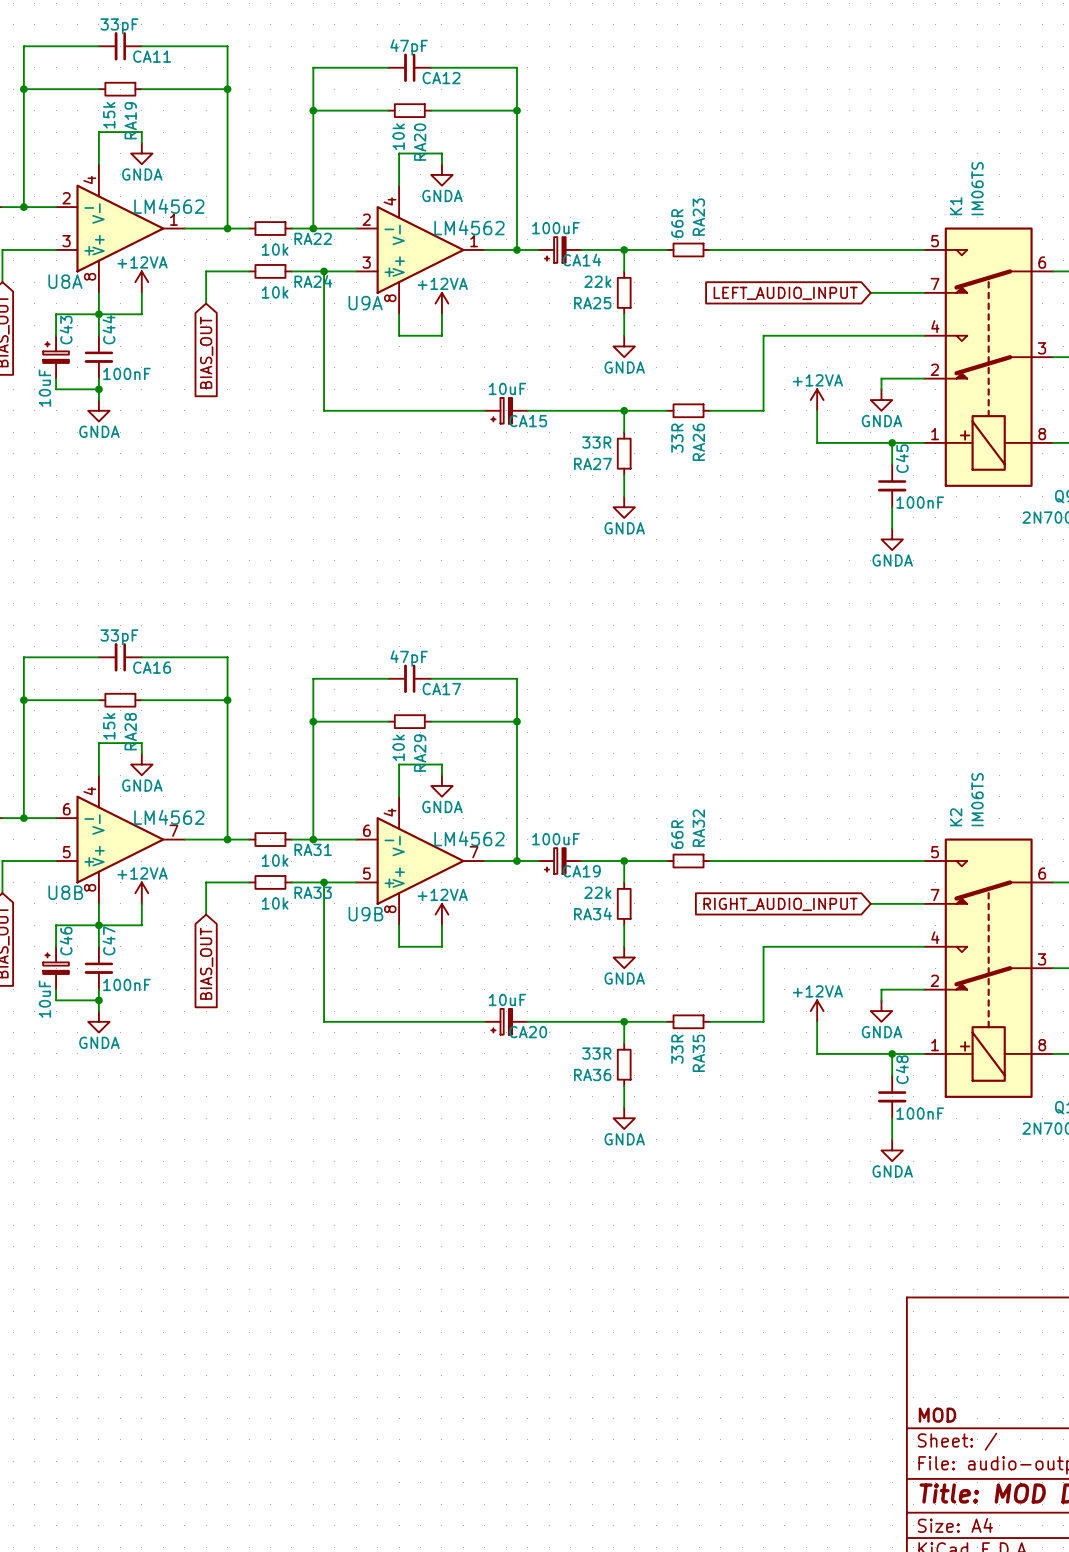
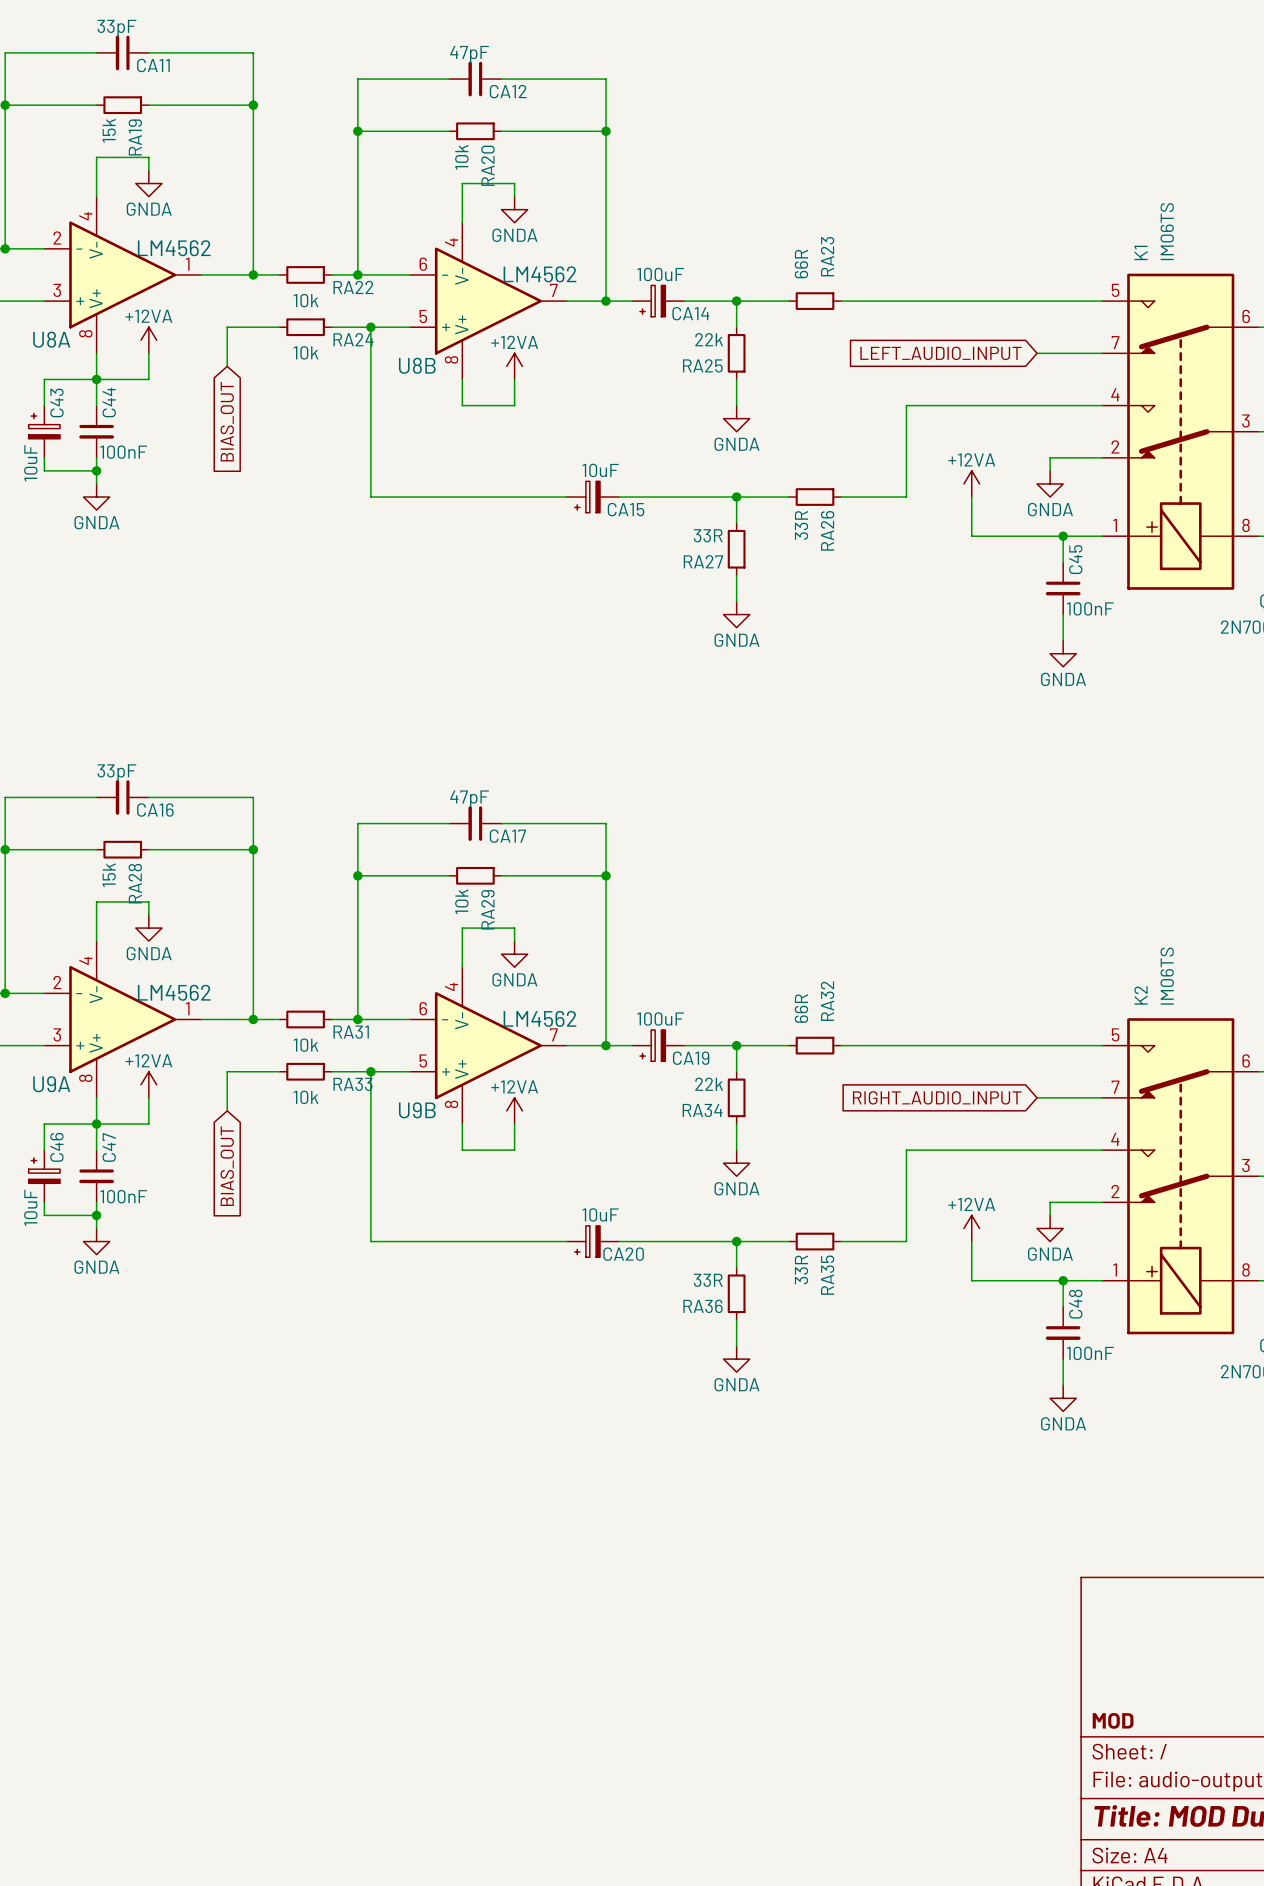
U9A position: (420, 249) -> (122, 1019)
U8B position: (120, 839) -> (488, 301)

